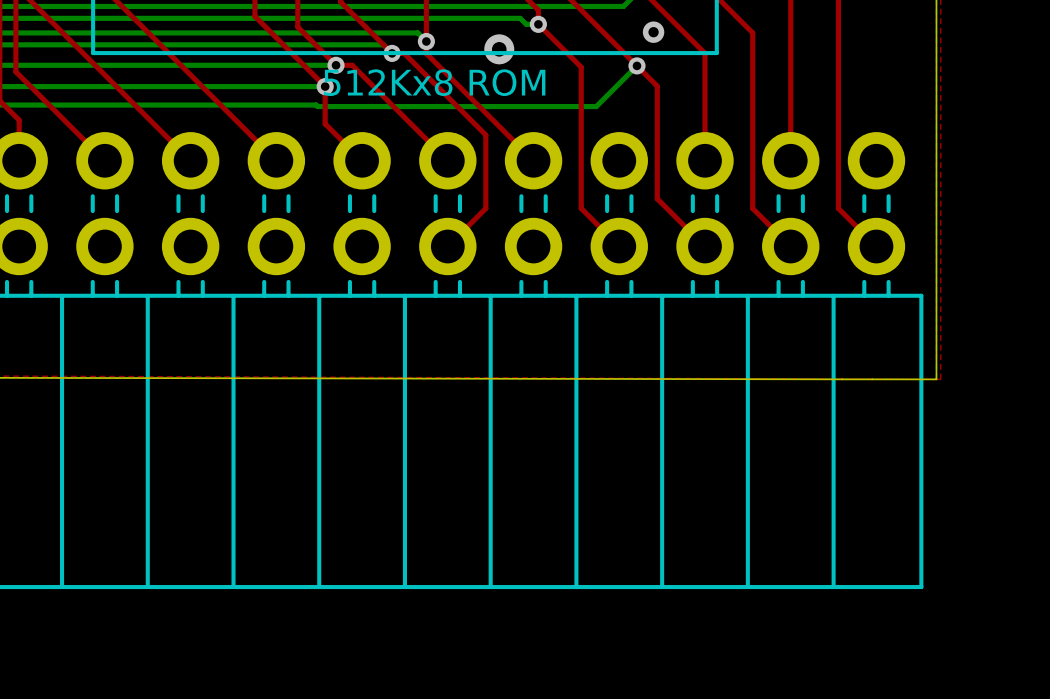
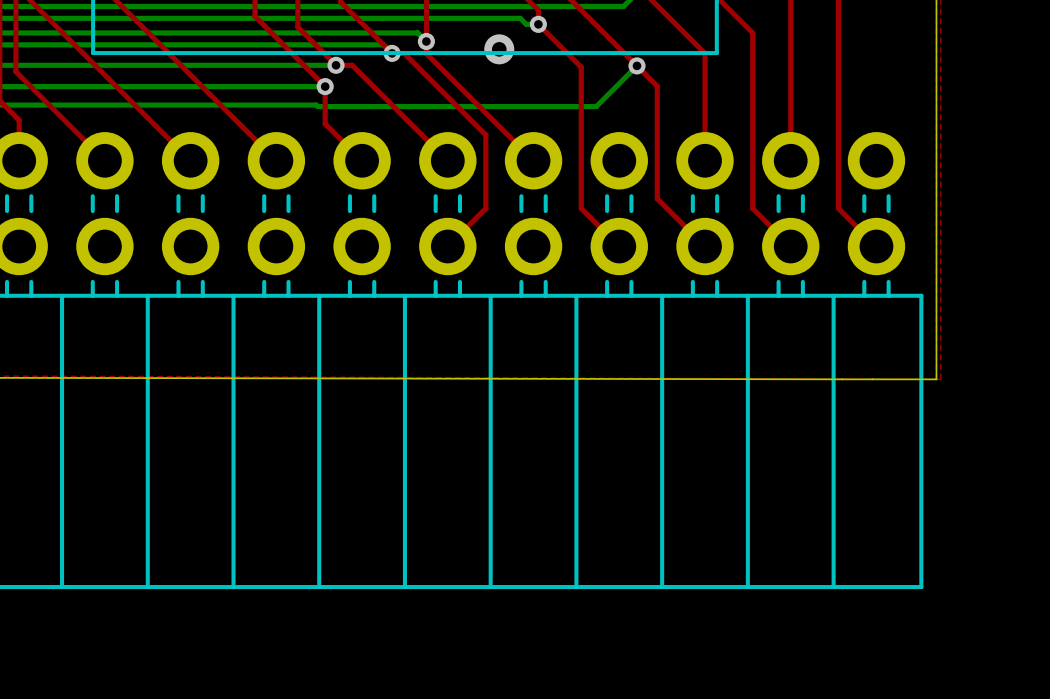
via: (653, 32) -> none
text: 512Kx8 ROM (434, 82) -> none

